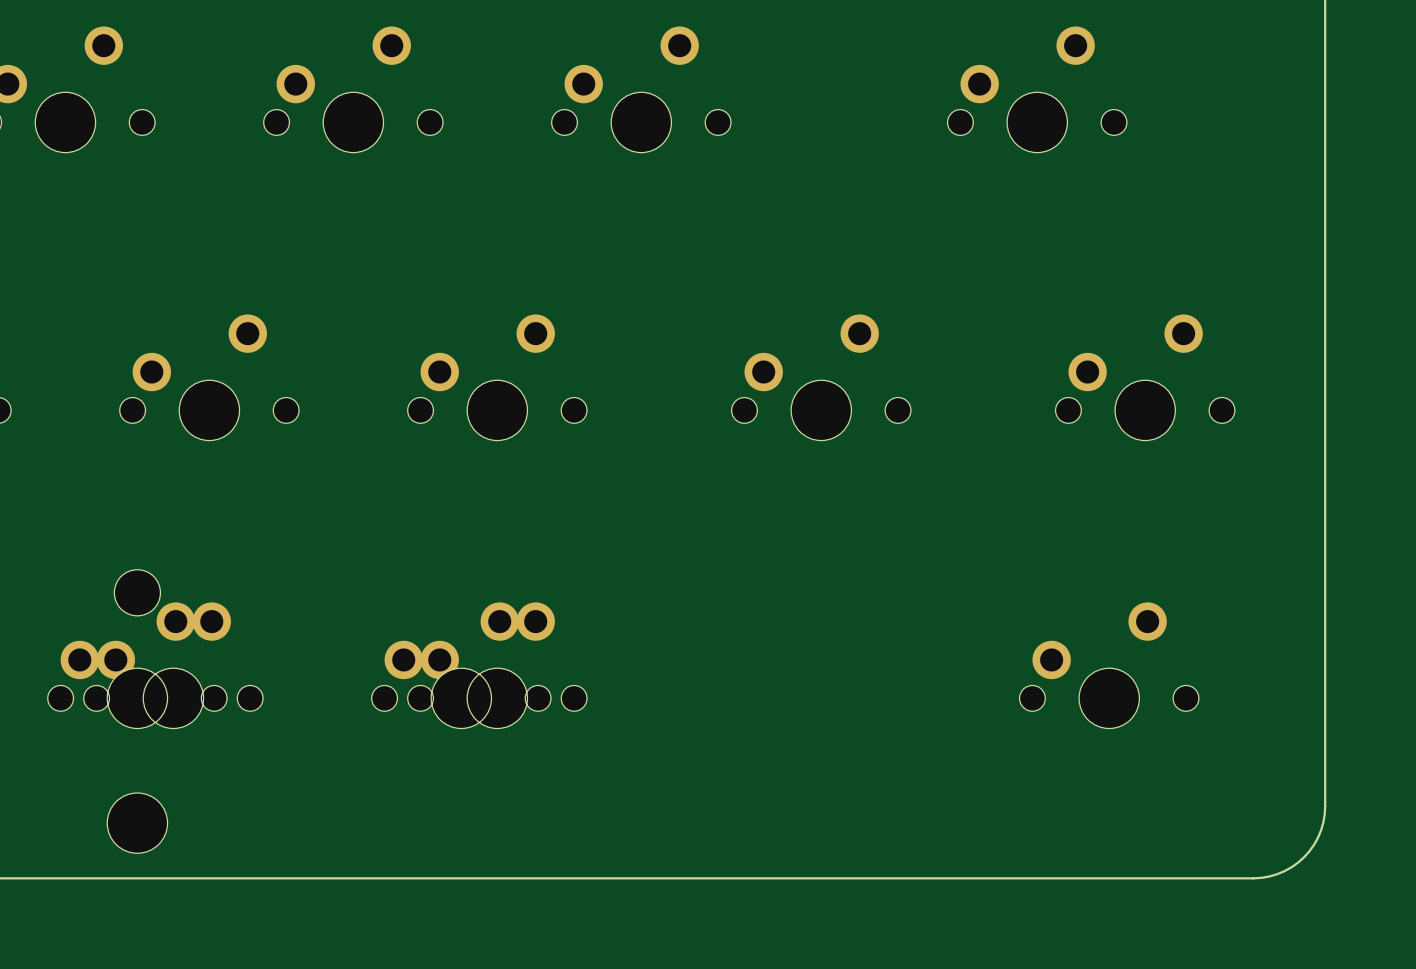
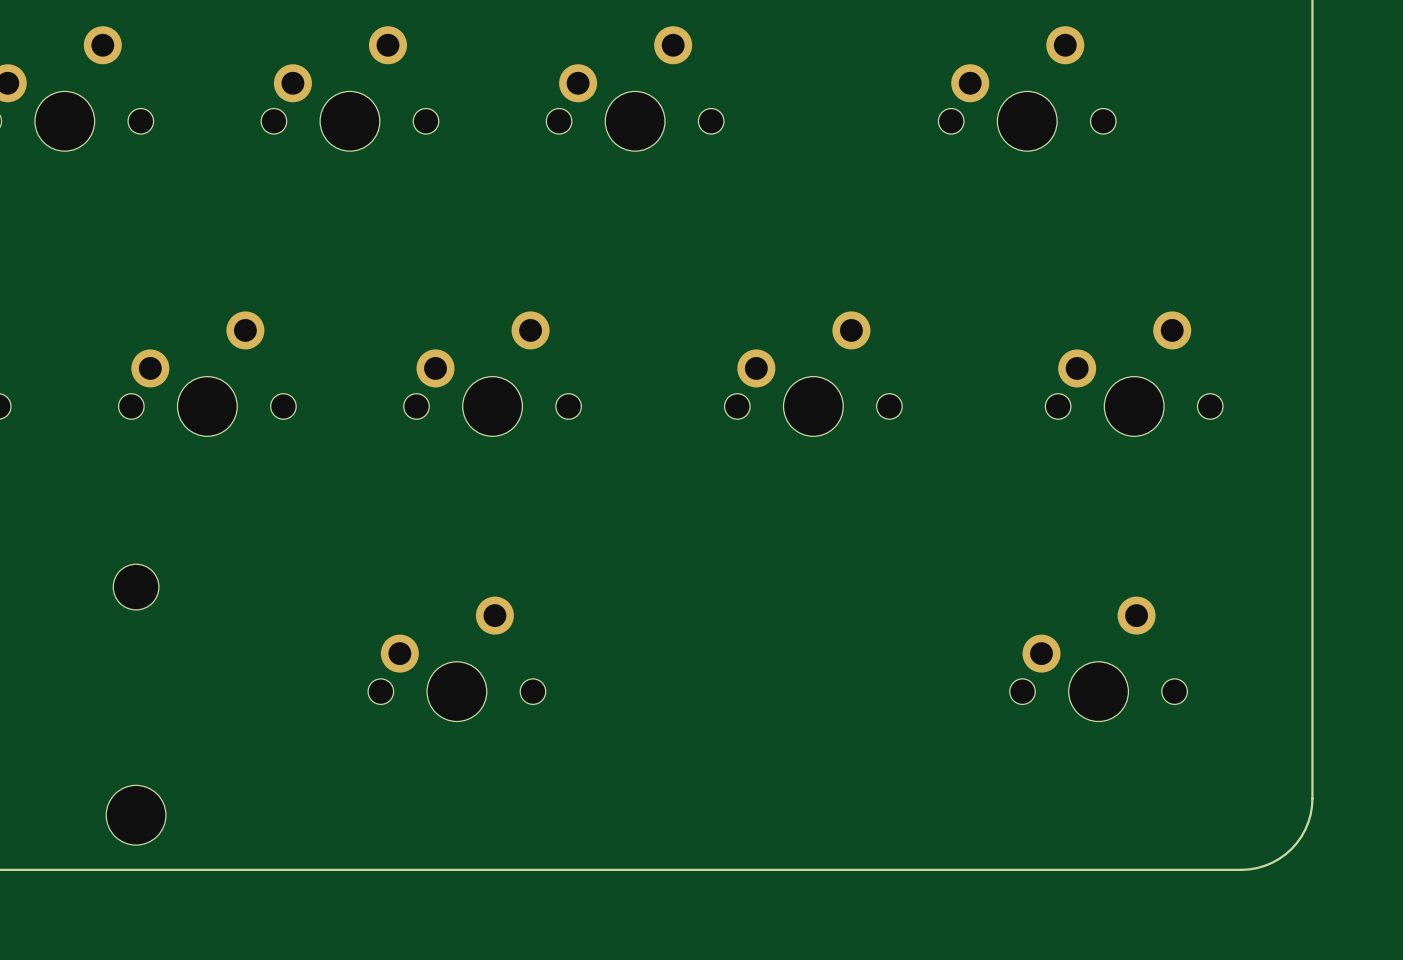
part: (137, 665) -> none
part: (173, 665) -> none
part: (497, 665) -> none

